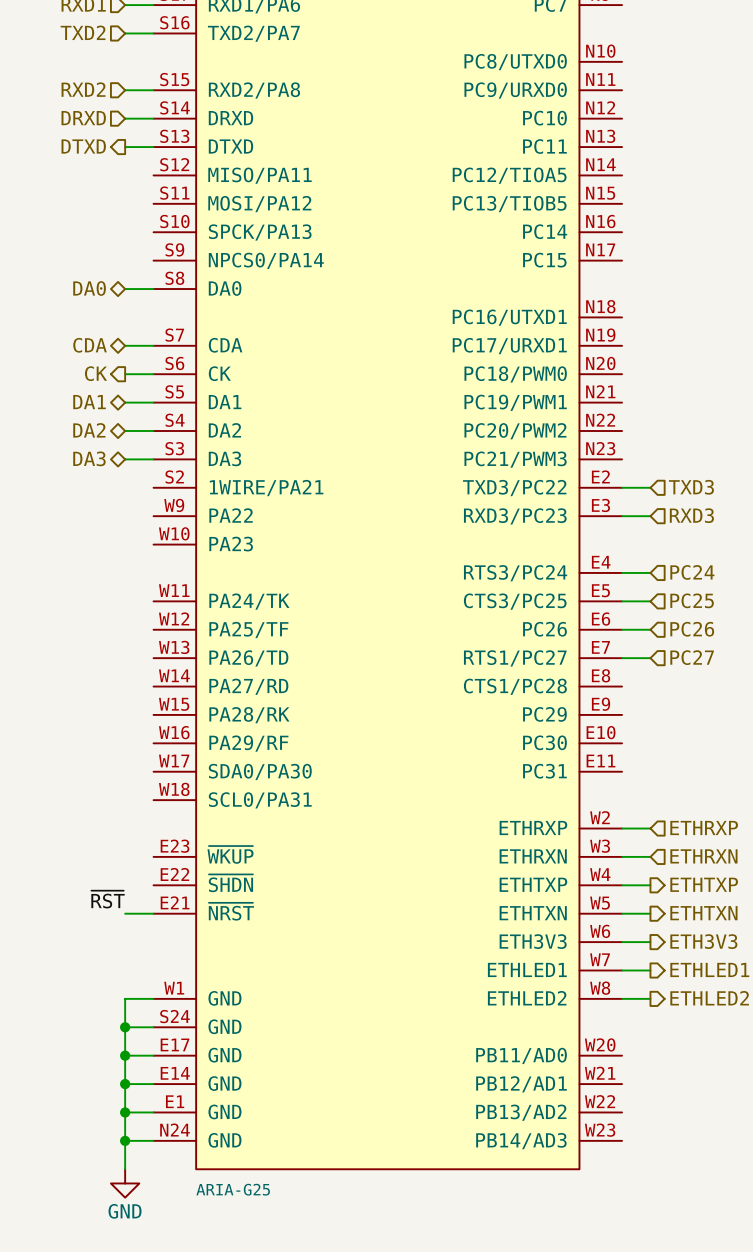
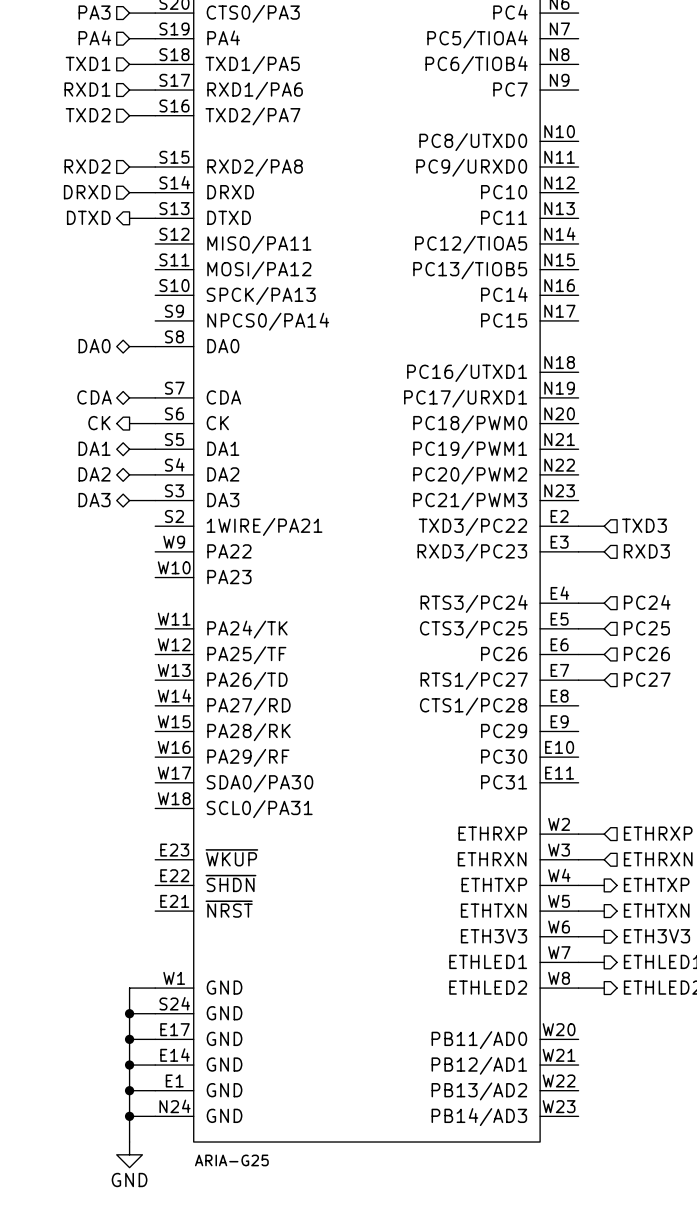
label: ~{RST} (108, 899) -> none
wire: (125, 913) (153, 913) -> none

